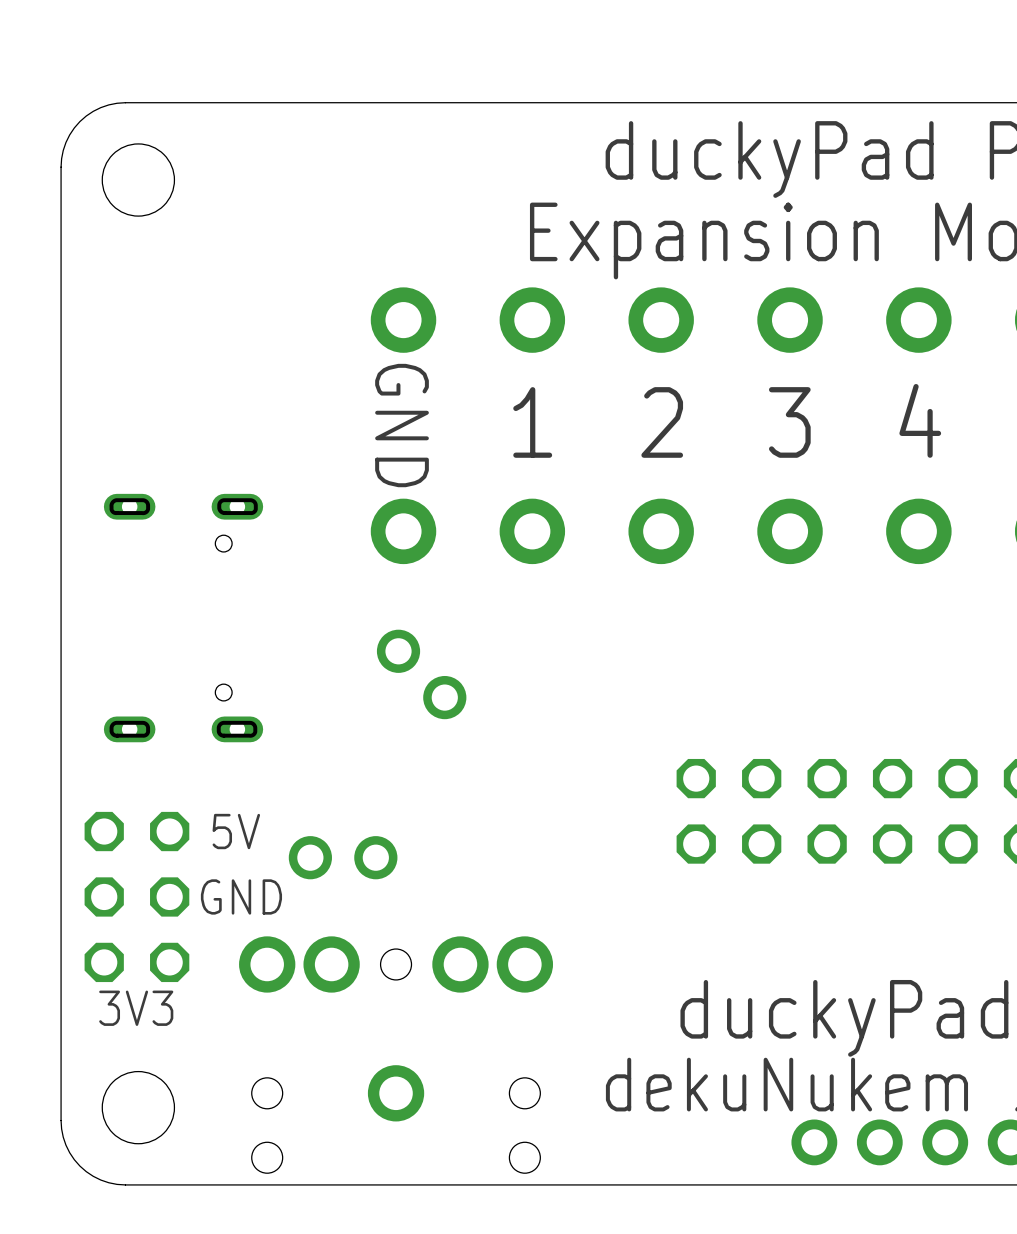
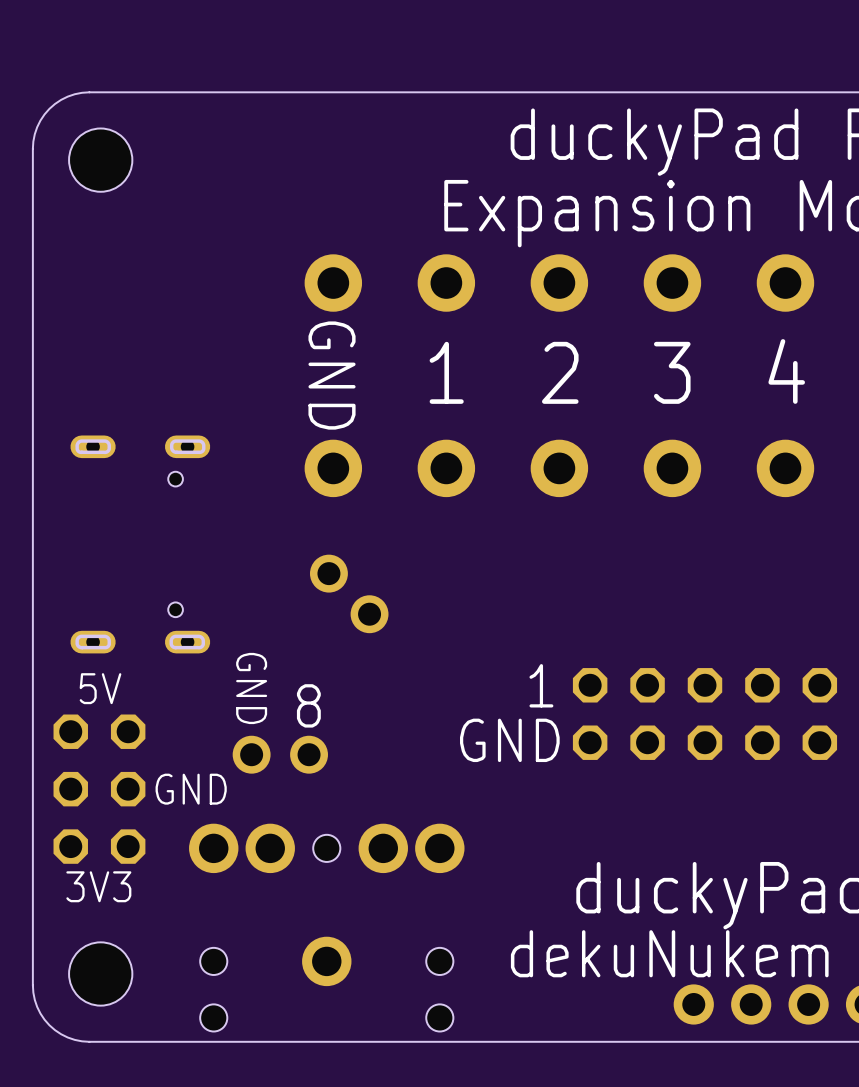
text: none -> 1 (541, 685)
text: none -> GND (251, 688)
text: none -> 8 (308, 705)
text position: 5V (236, 831) -> 5V (100, 688)
text: none -> GND (509, 740)

